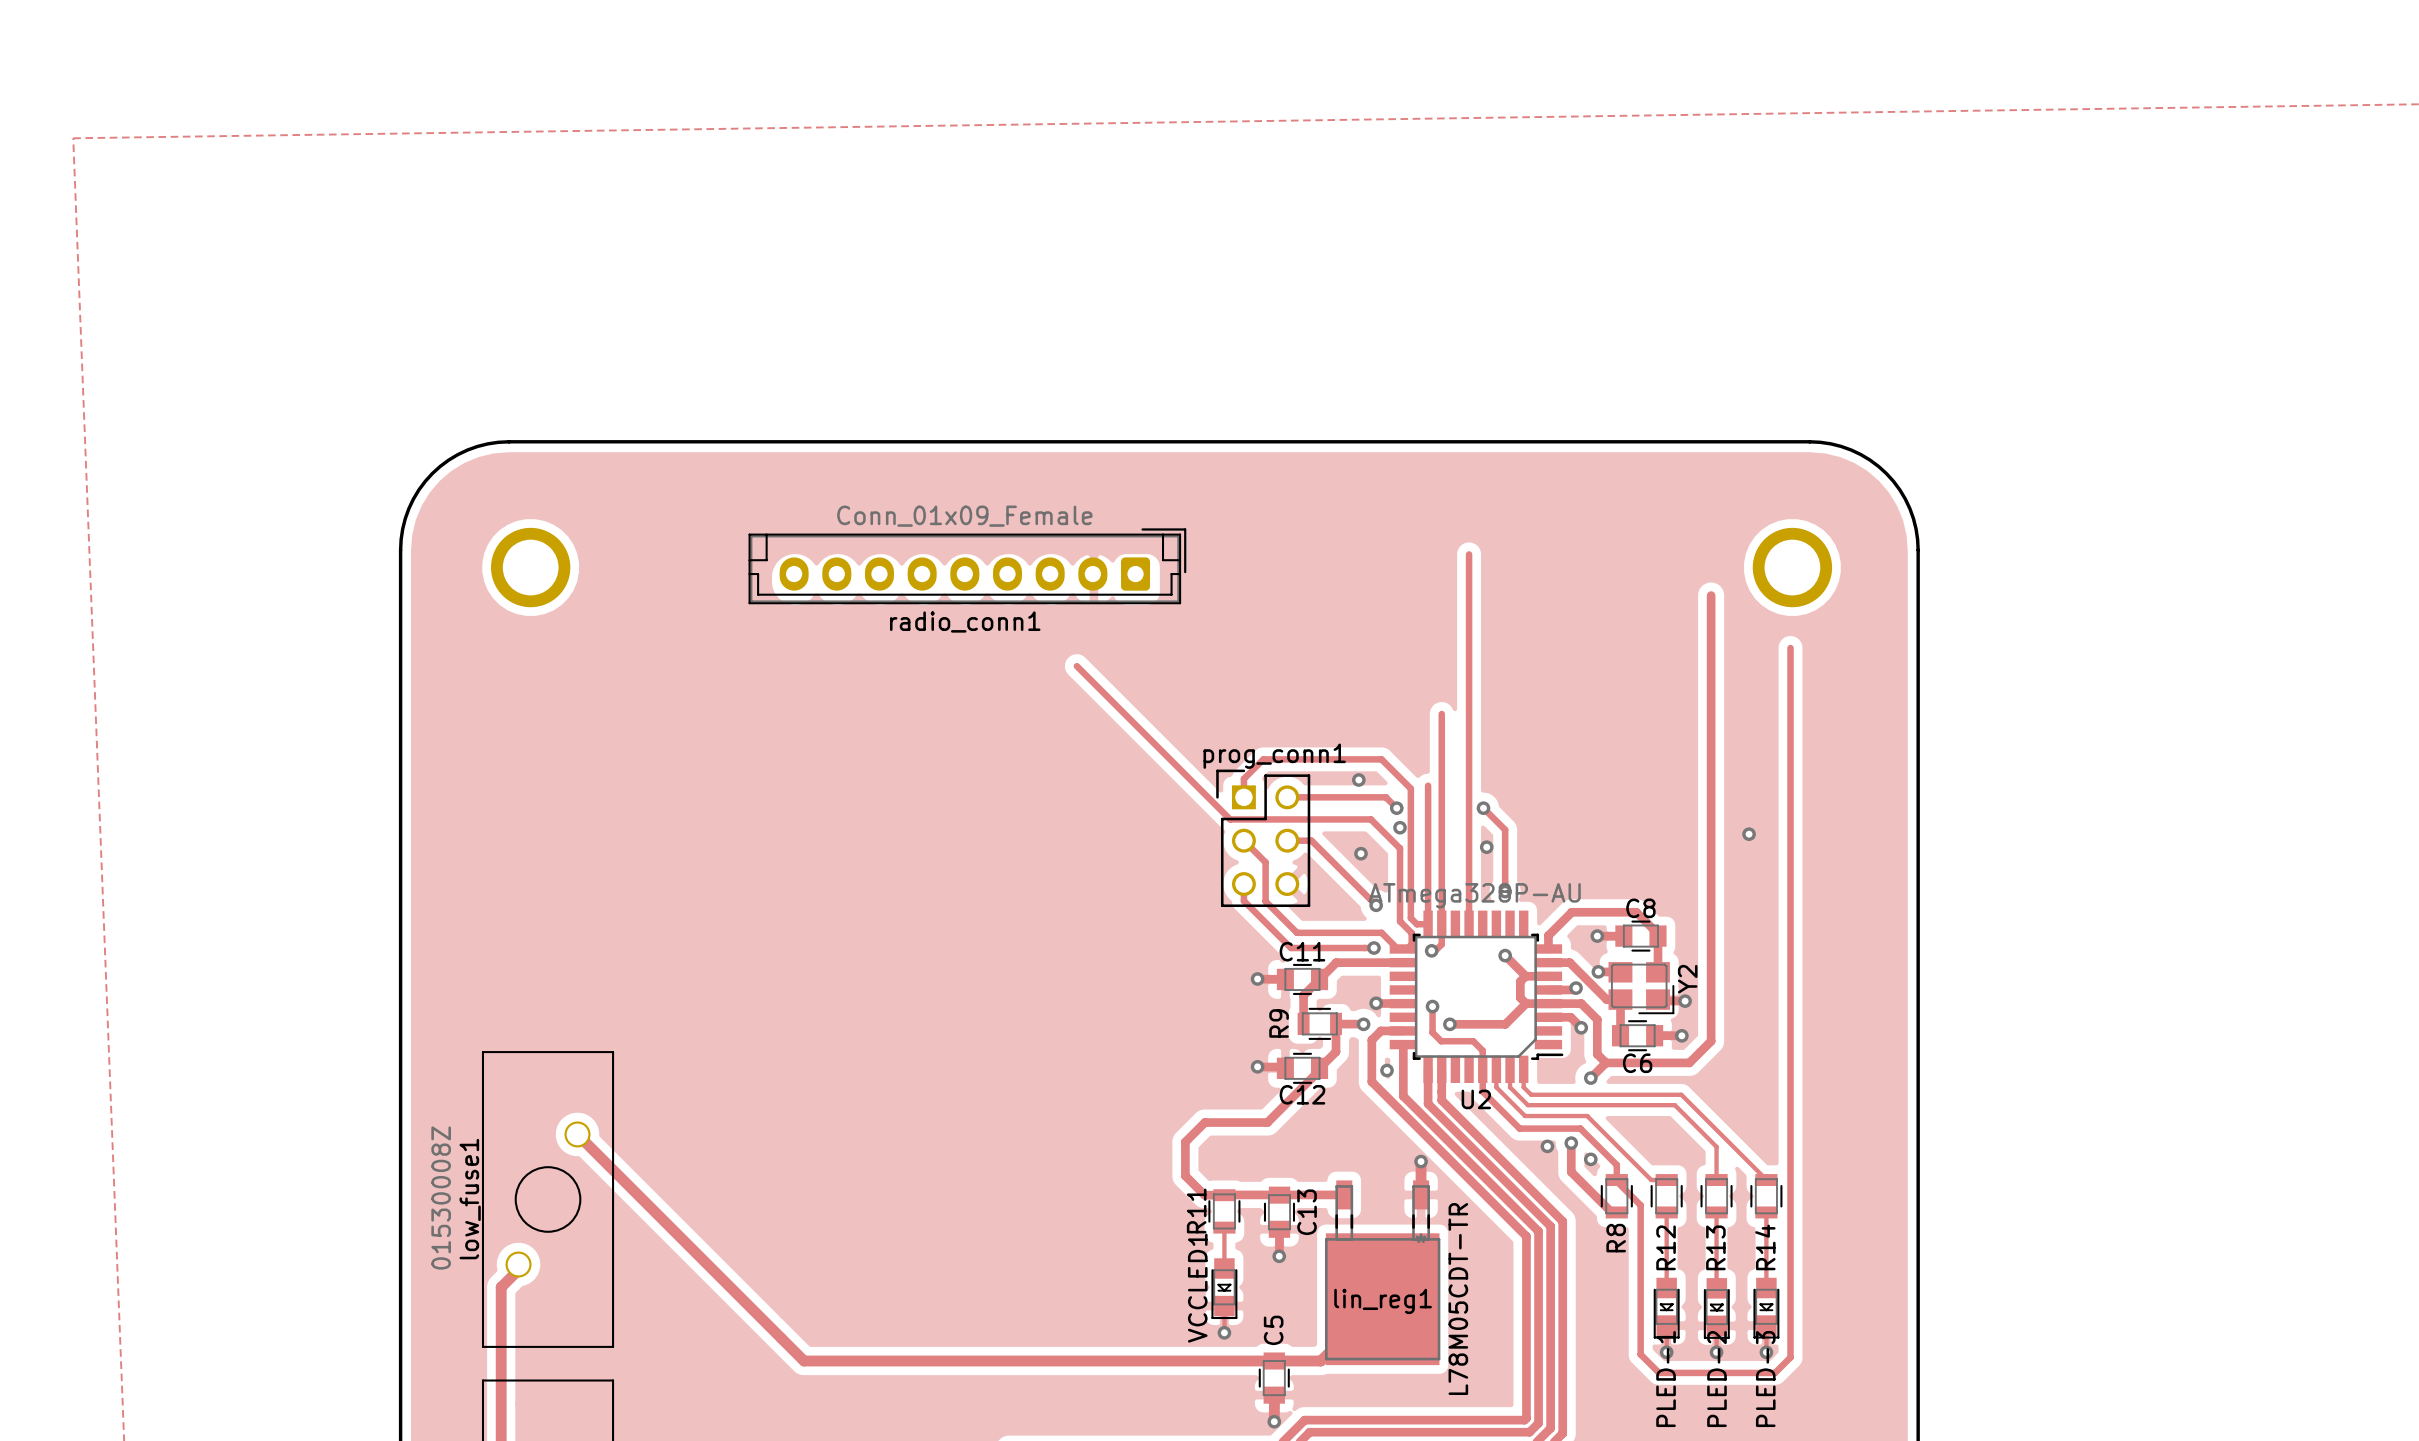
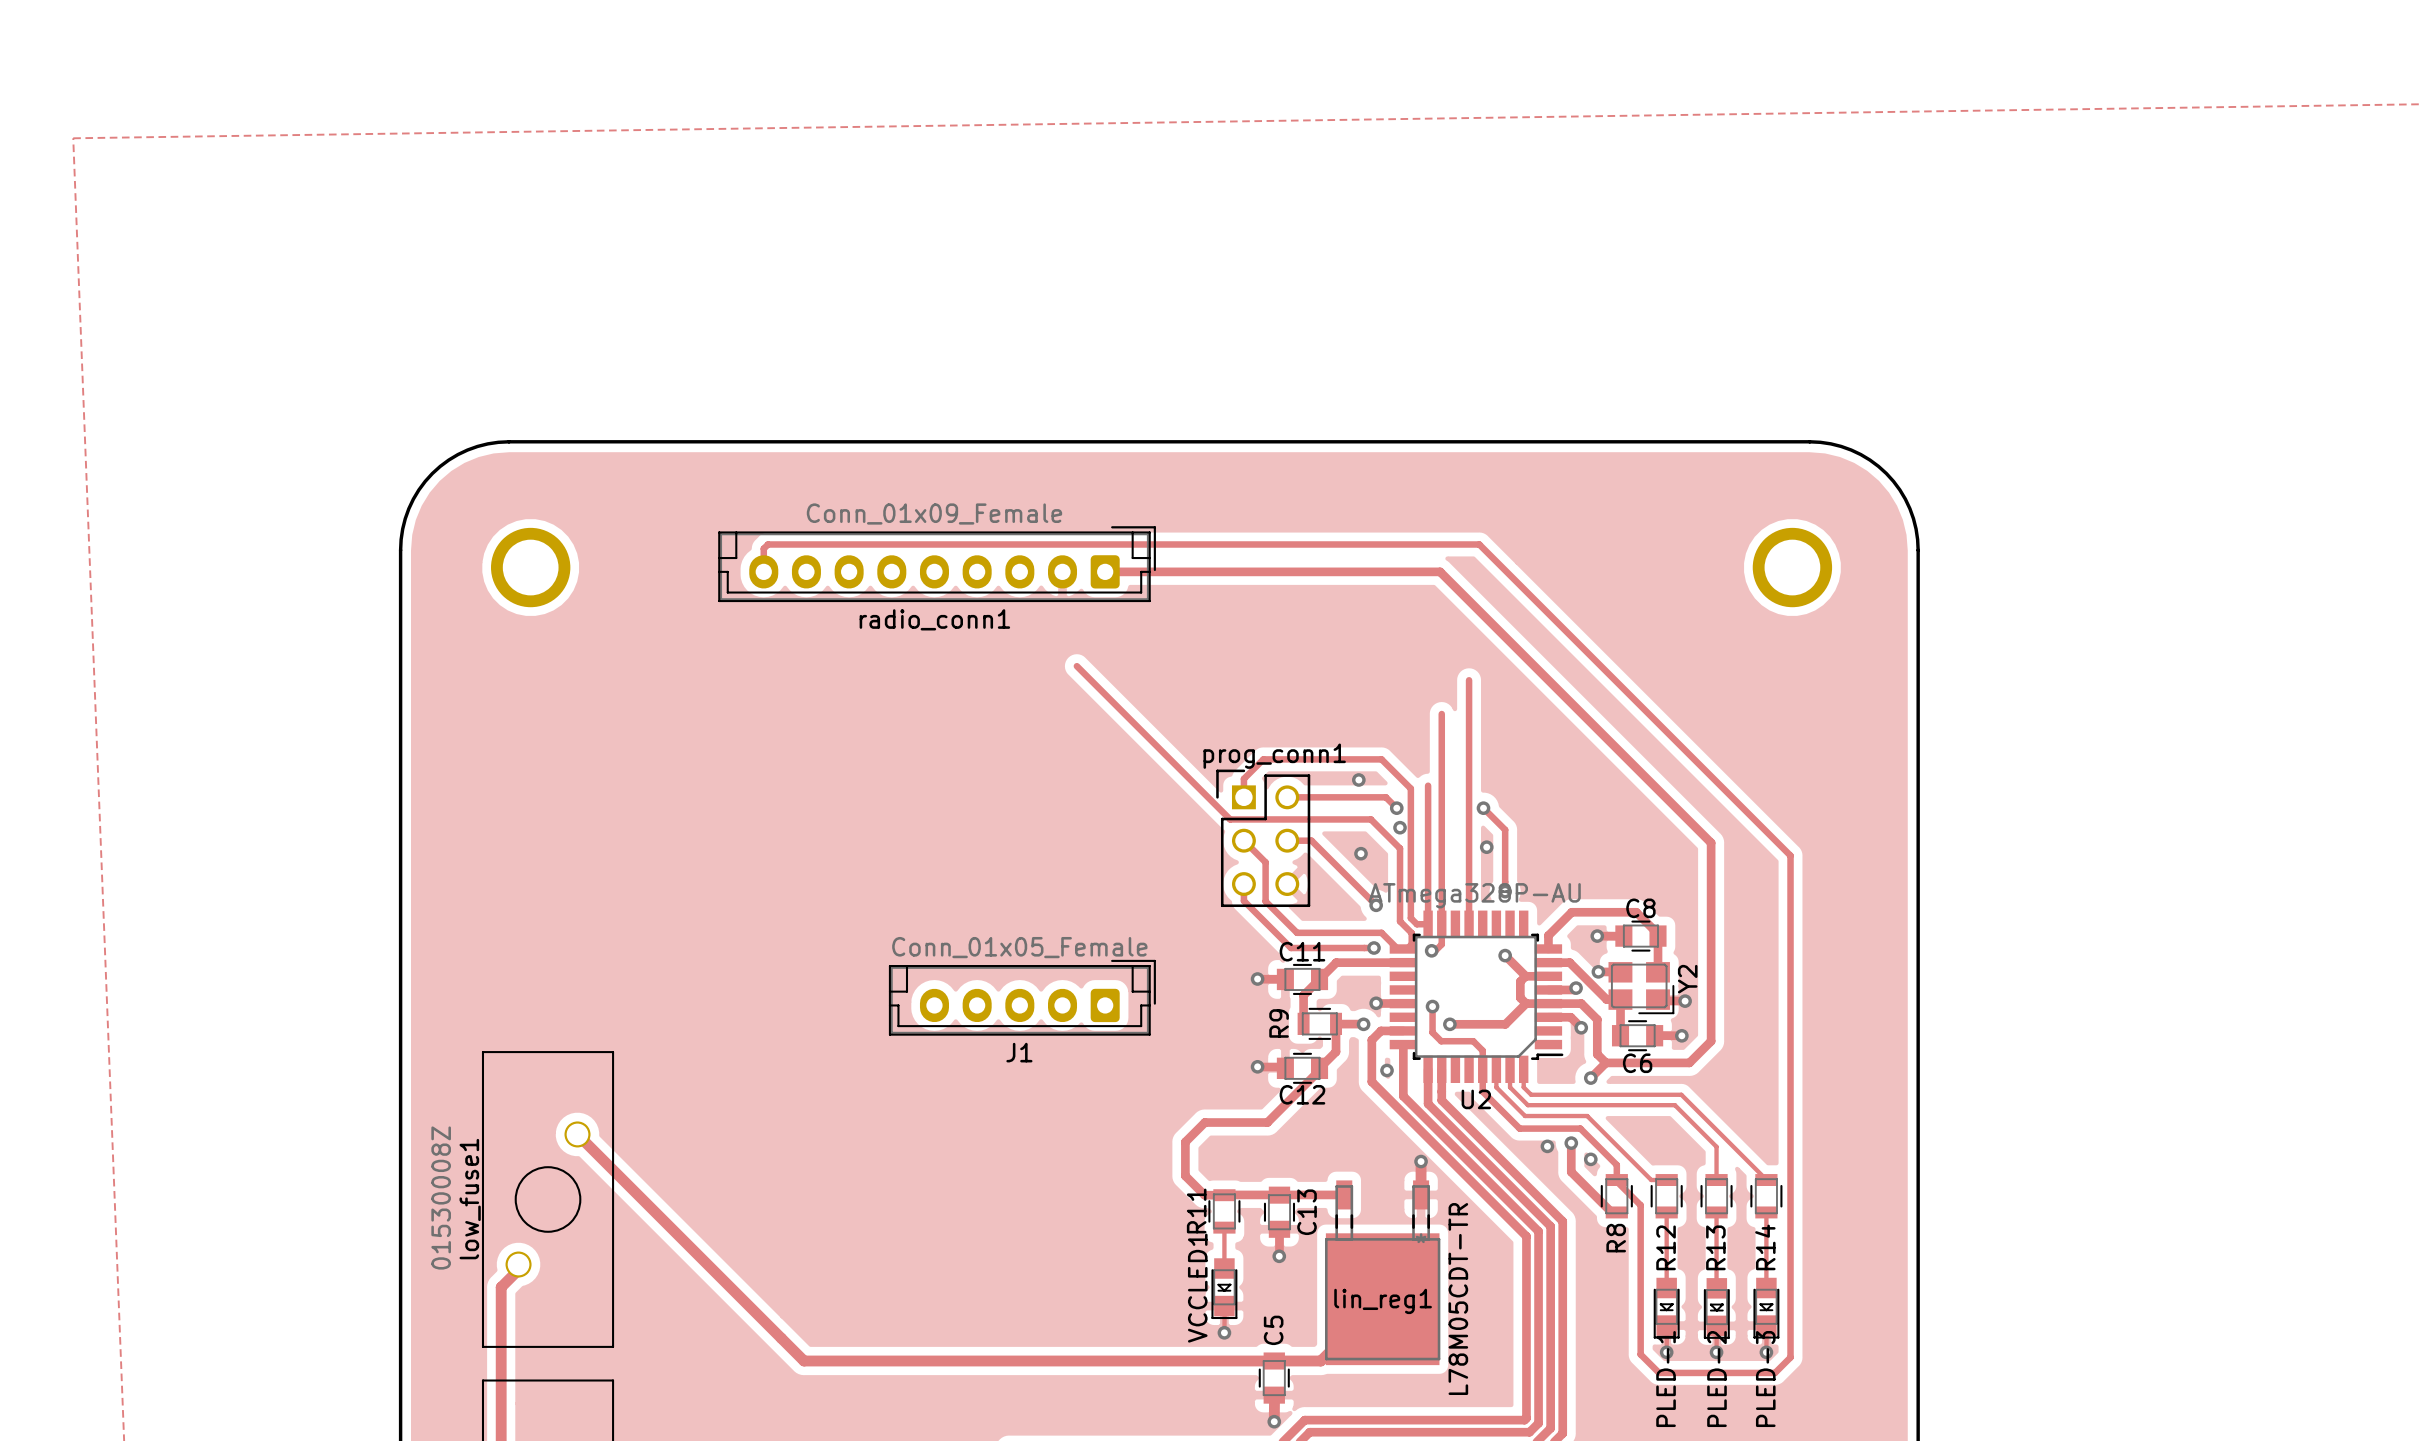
track: (1469, 554) (1469, 680) -> none
radio_conn1 position: (967, 566) -> (937, 564)
track: (1711, 595) (1711, 842) -> (1105, 571) (1440, 571) (1711, 842)
track: (1790, 648) (1790, 855) -> (763, 571) (763, 548) (768, 544) (1479, 544) (1790, 855)
via: (1749, 834) -> none
J1: none -> Conn_01x05_Female (1022, 997)

